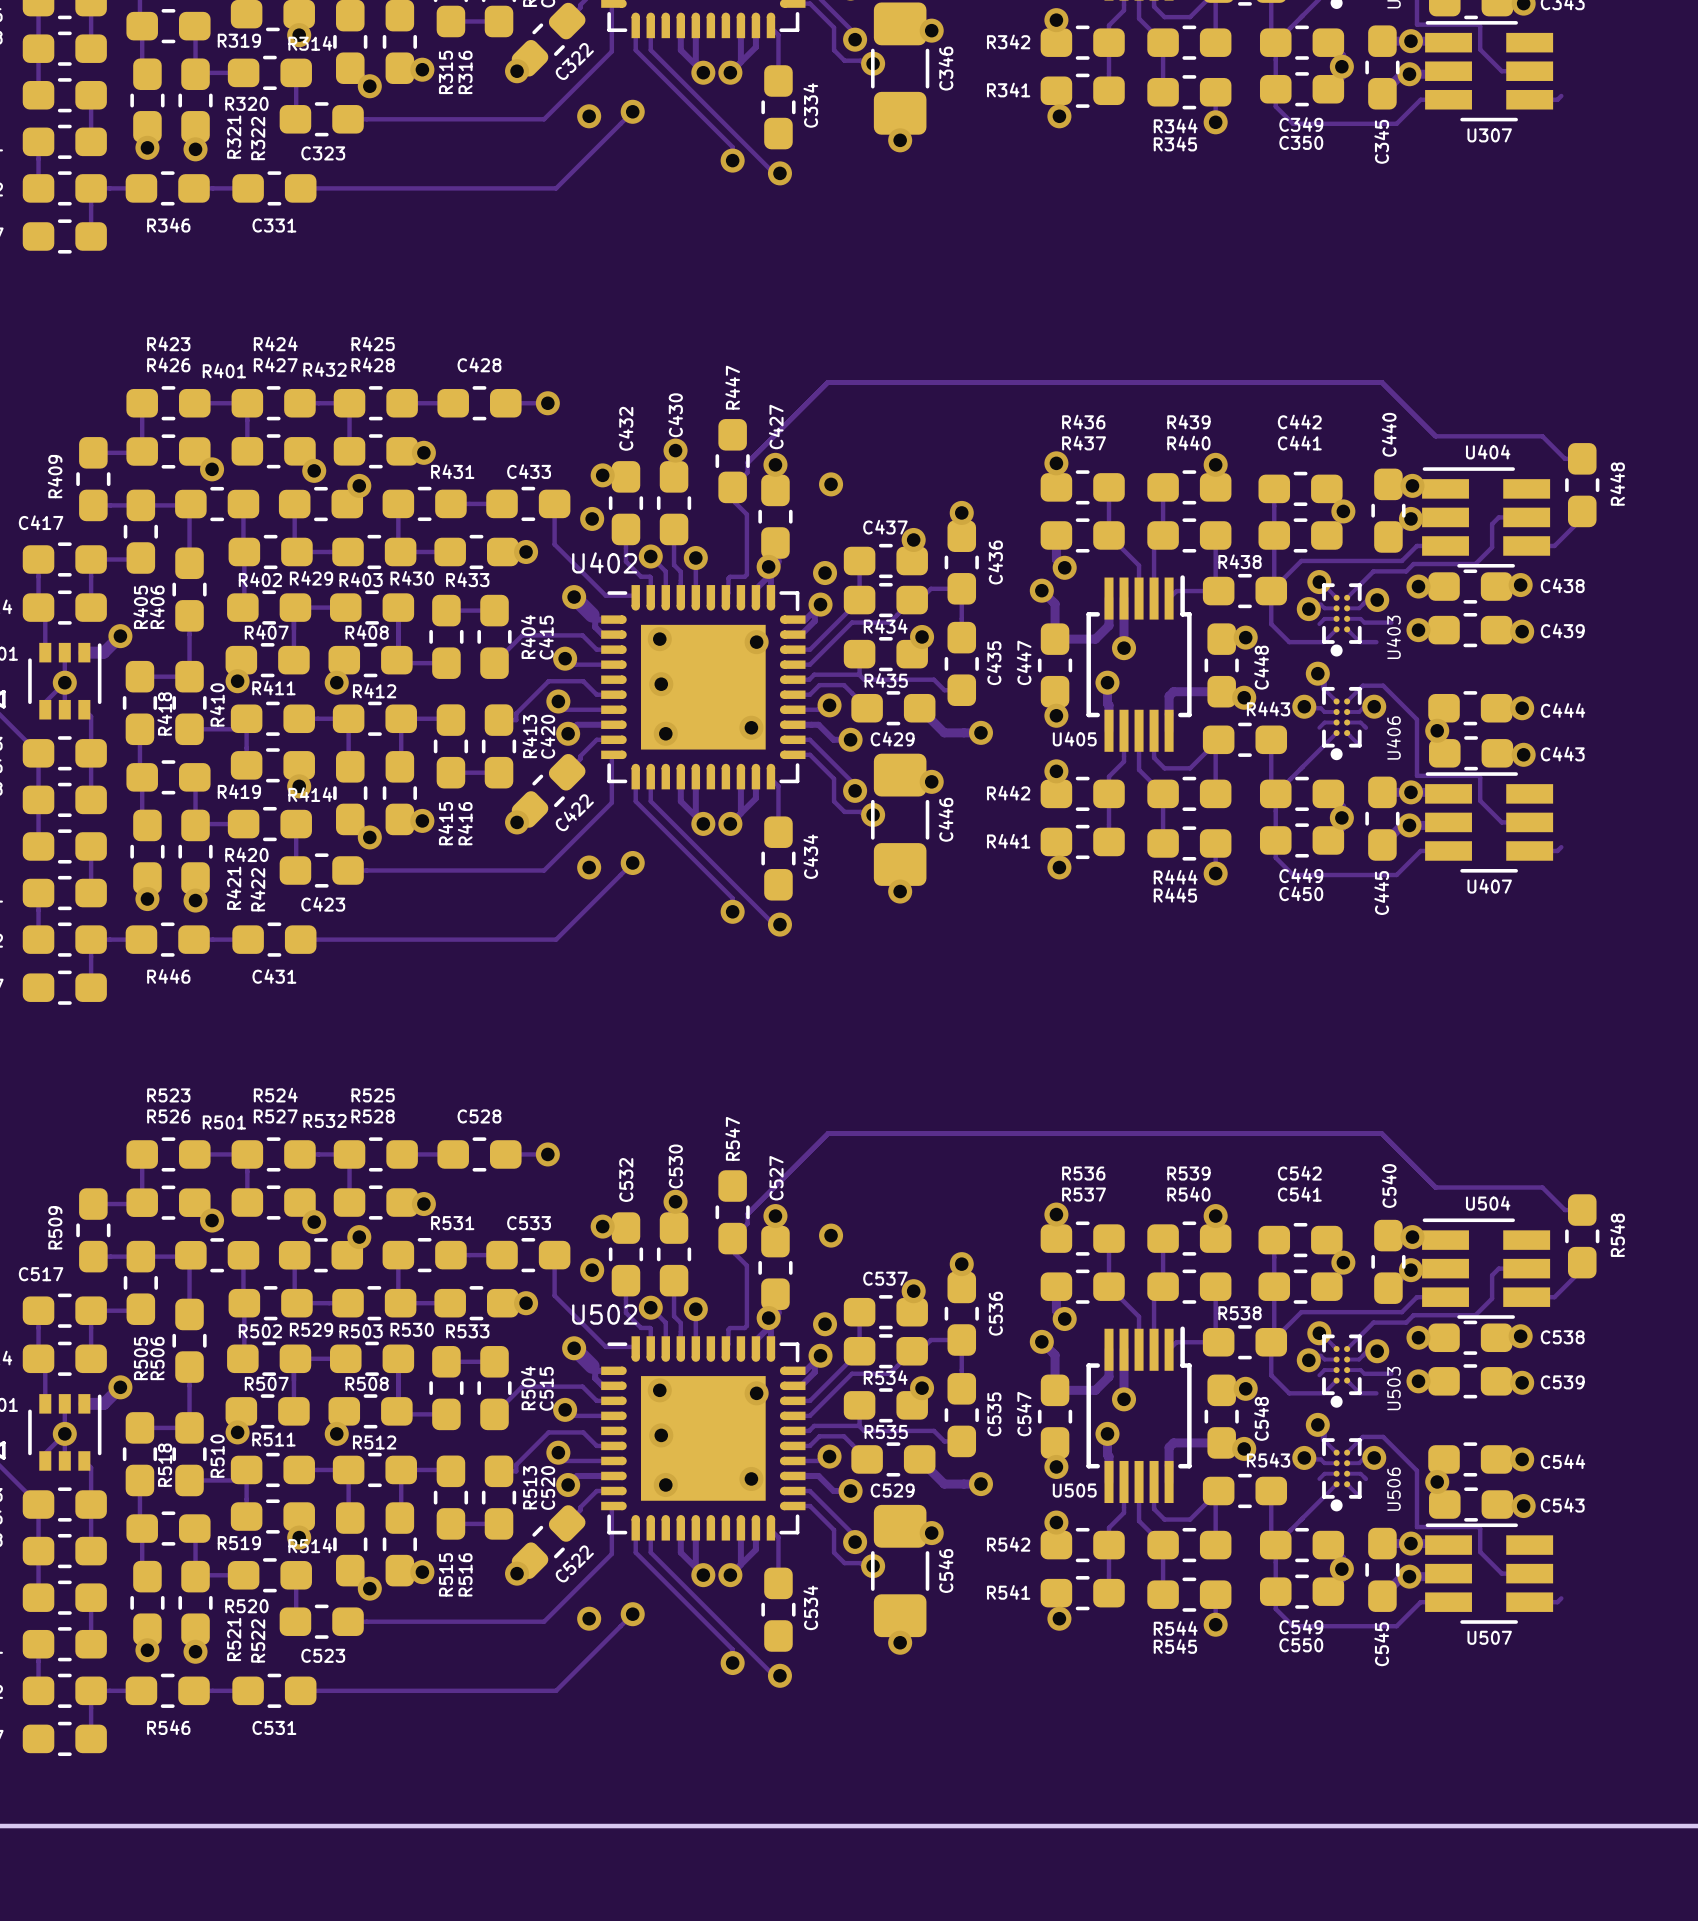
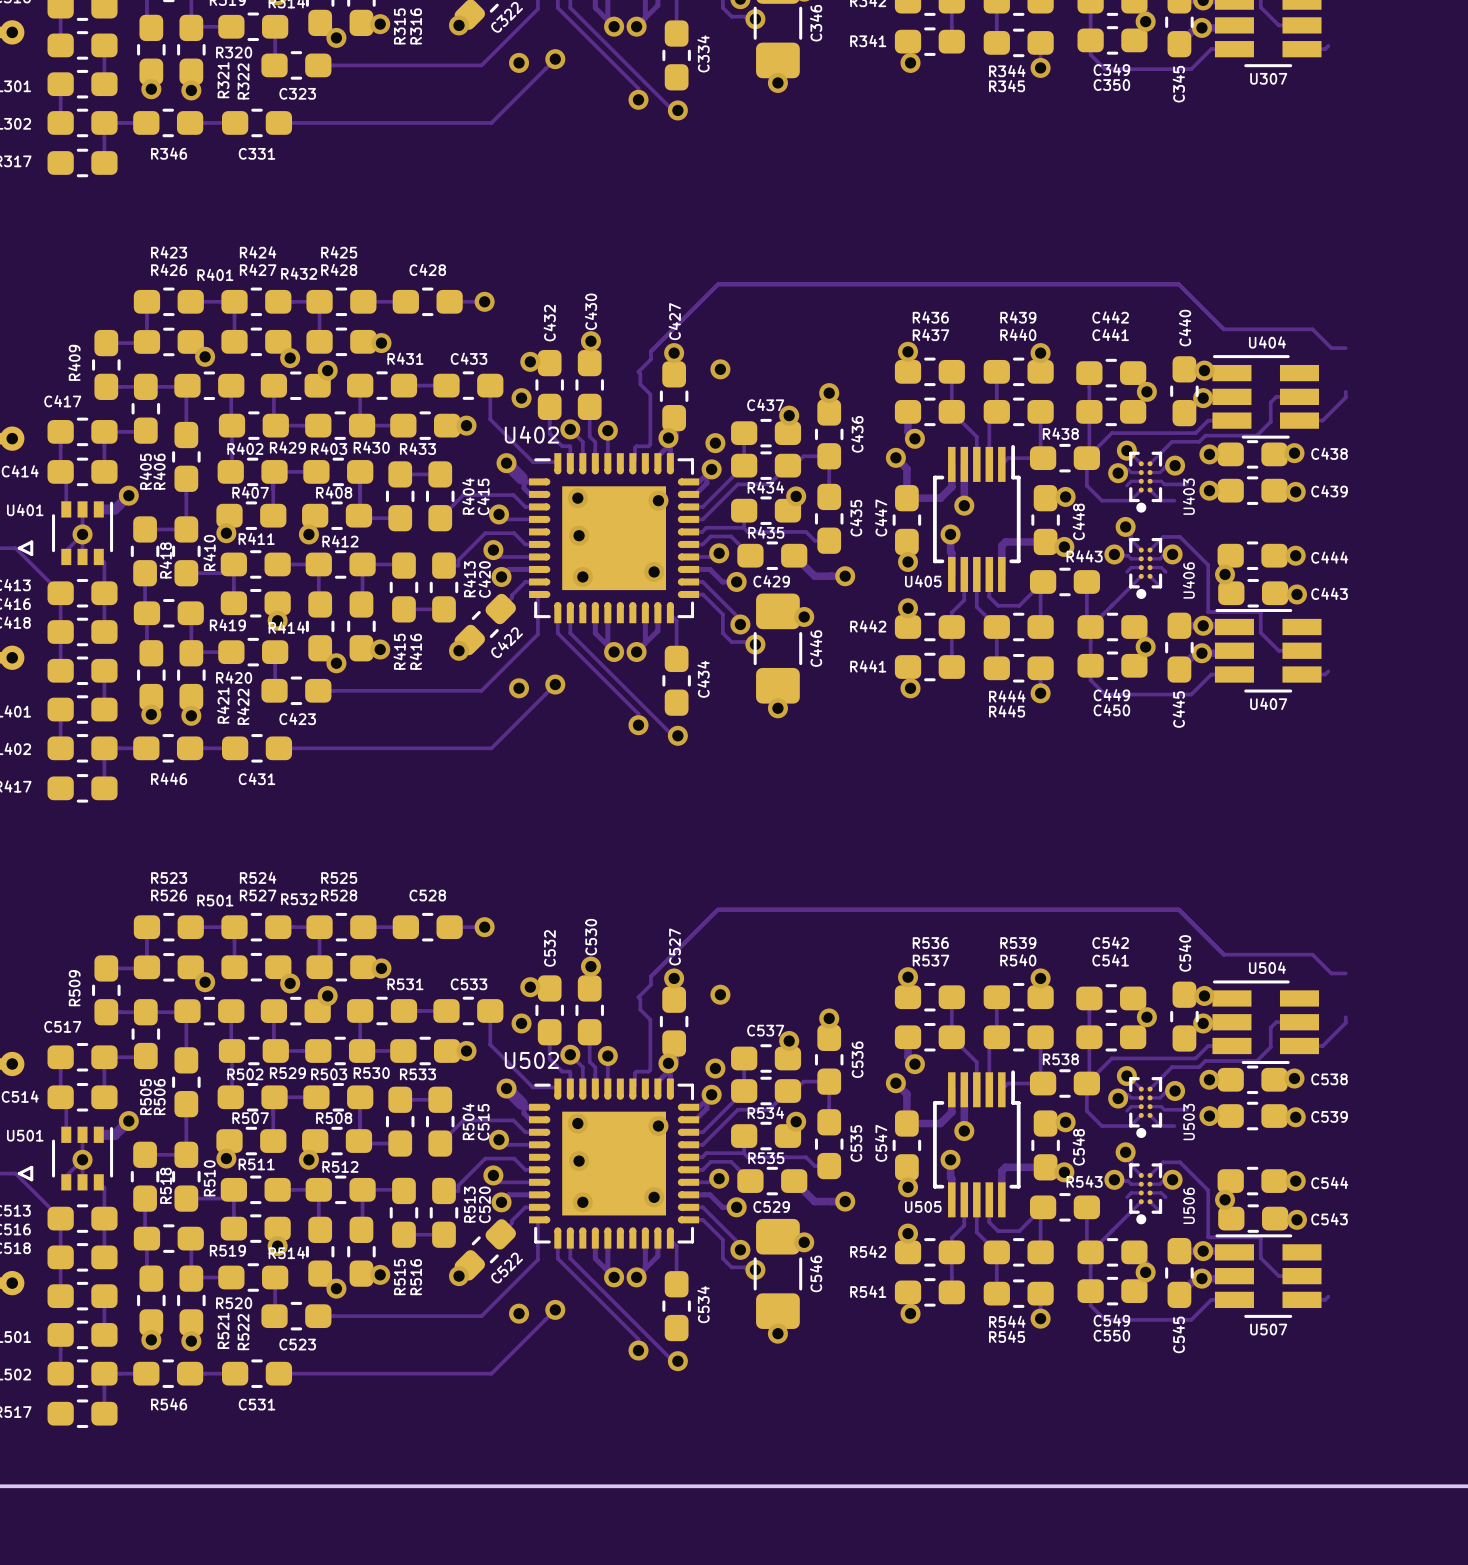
R447: (732, 461) -> none
R448: (1582, 485) -> none
R547: (732, 1212) -> none
R548: (1582, 1236) -> none

